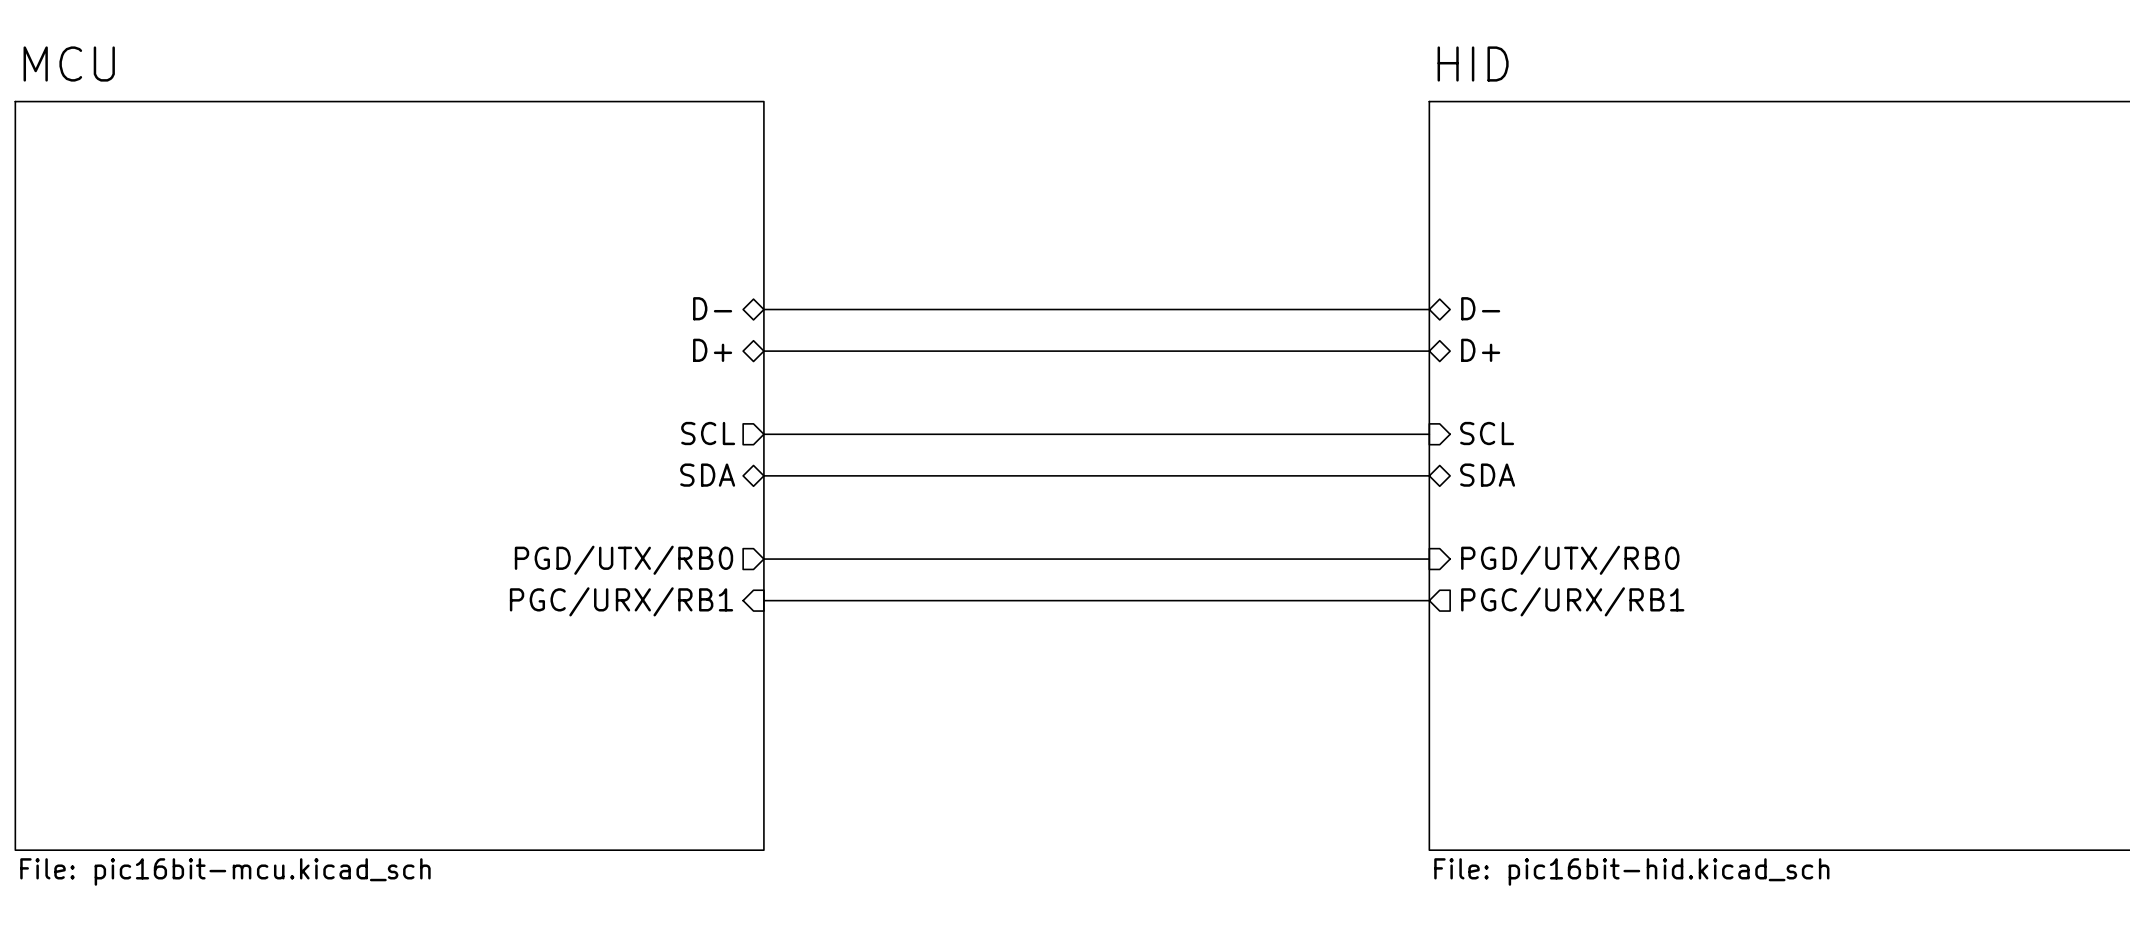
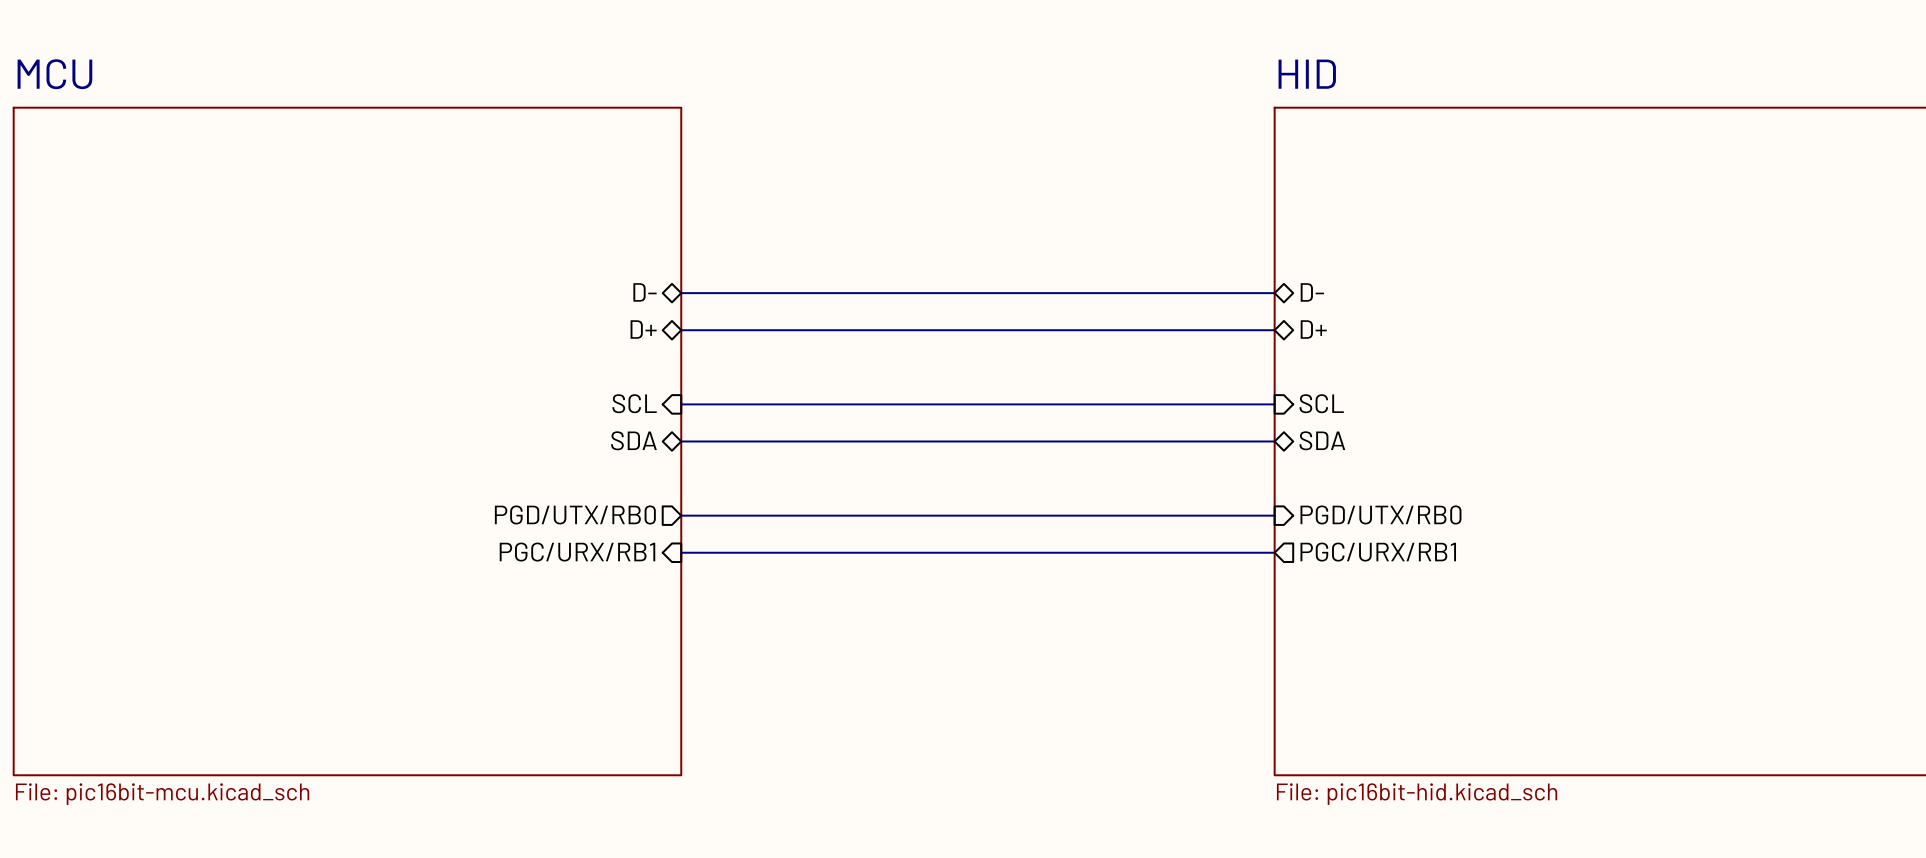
sheet pin shape: output (708, 433) -> input (634, 403)

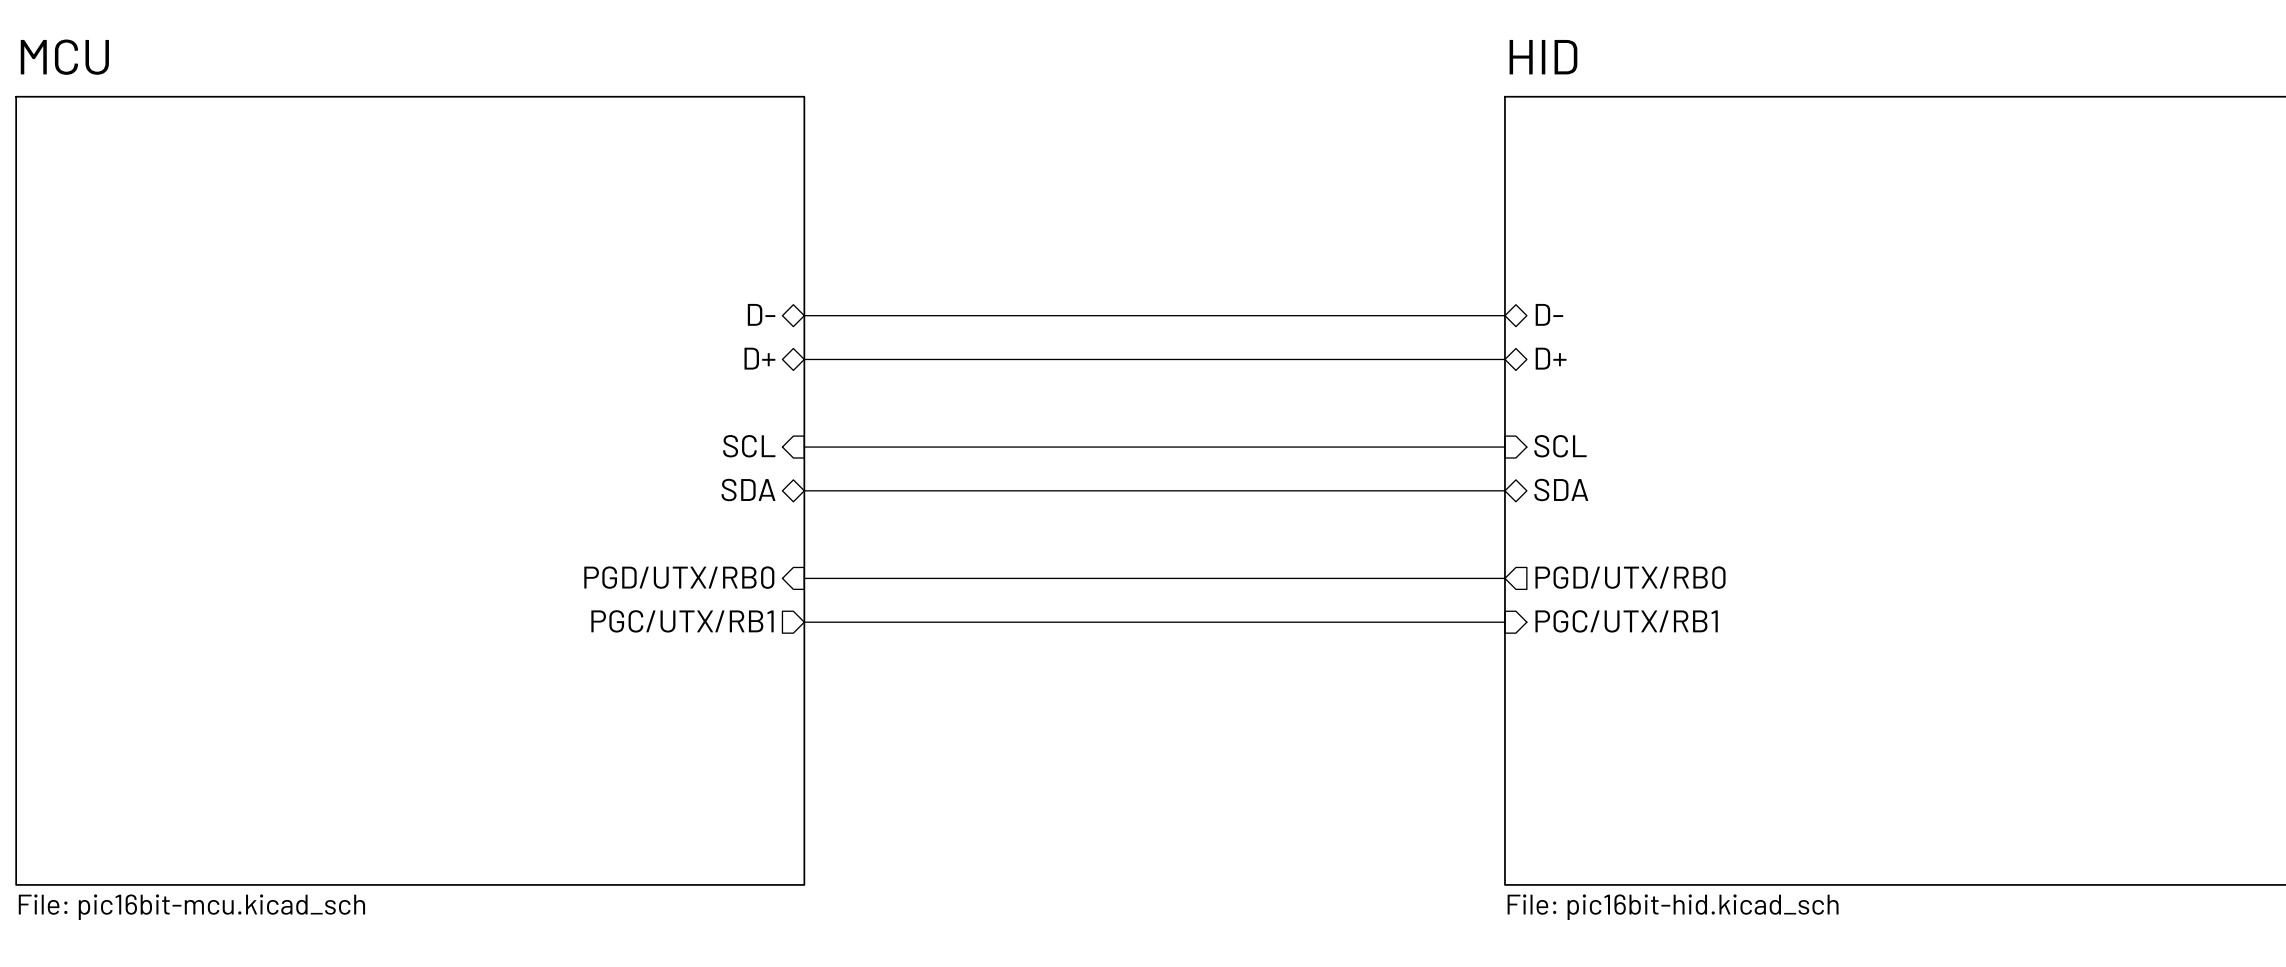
sheet pin shape: output (575, 514) -> input (679, 577)
sheet pin shape: input (1380, 514) -> output (1630, 577)
sheet pin shape: input (577, 552) -> output (682, 621)
sheet pin: PGC/URX/RB1 (577, 552) -> PGC/UTX/RB1 (682, 621)
sheet pin shape: output (1378, 552) -> input (1626, 621)
sheet pin: PGC/URX/RB1 (1378, 552) -> PGC/UTX/RB1 (1626, 621)

